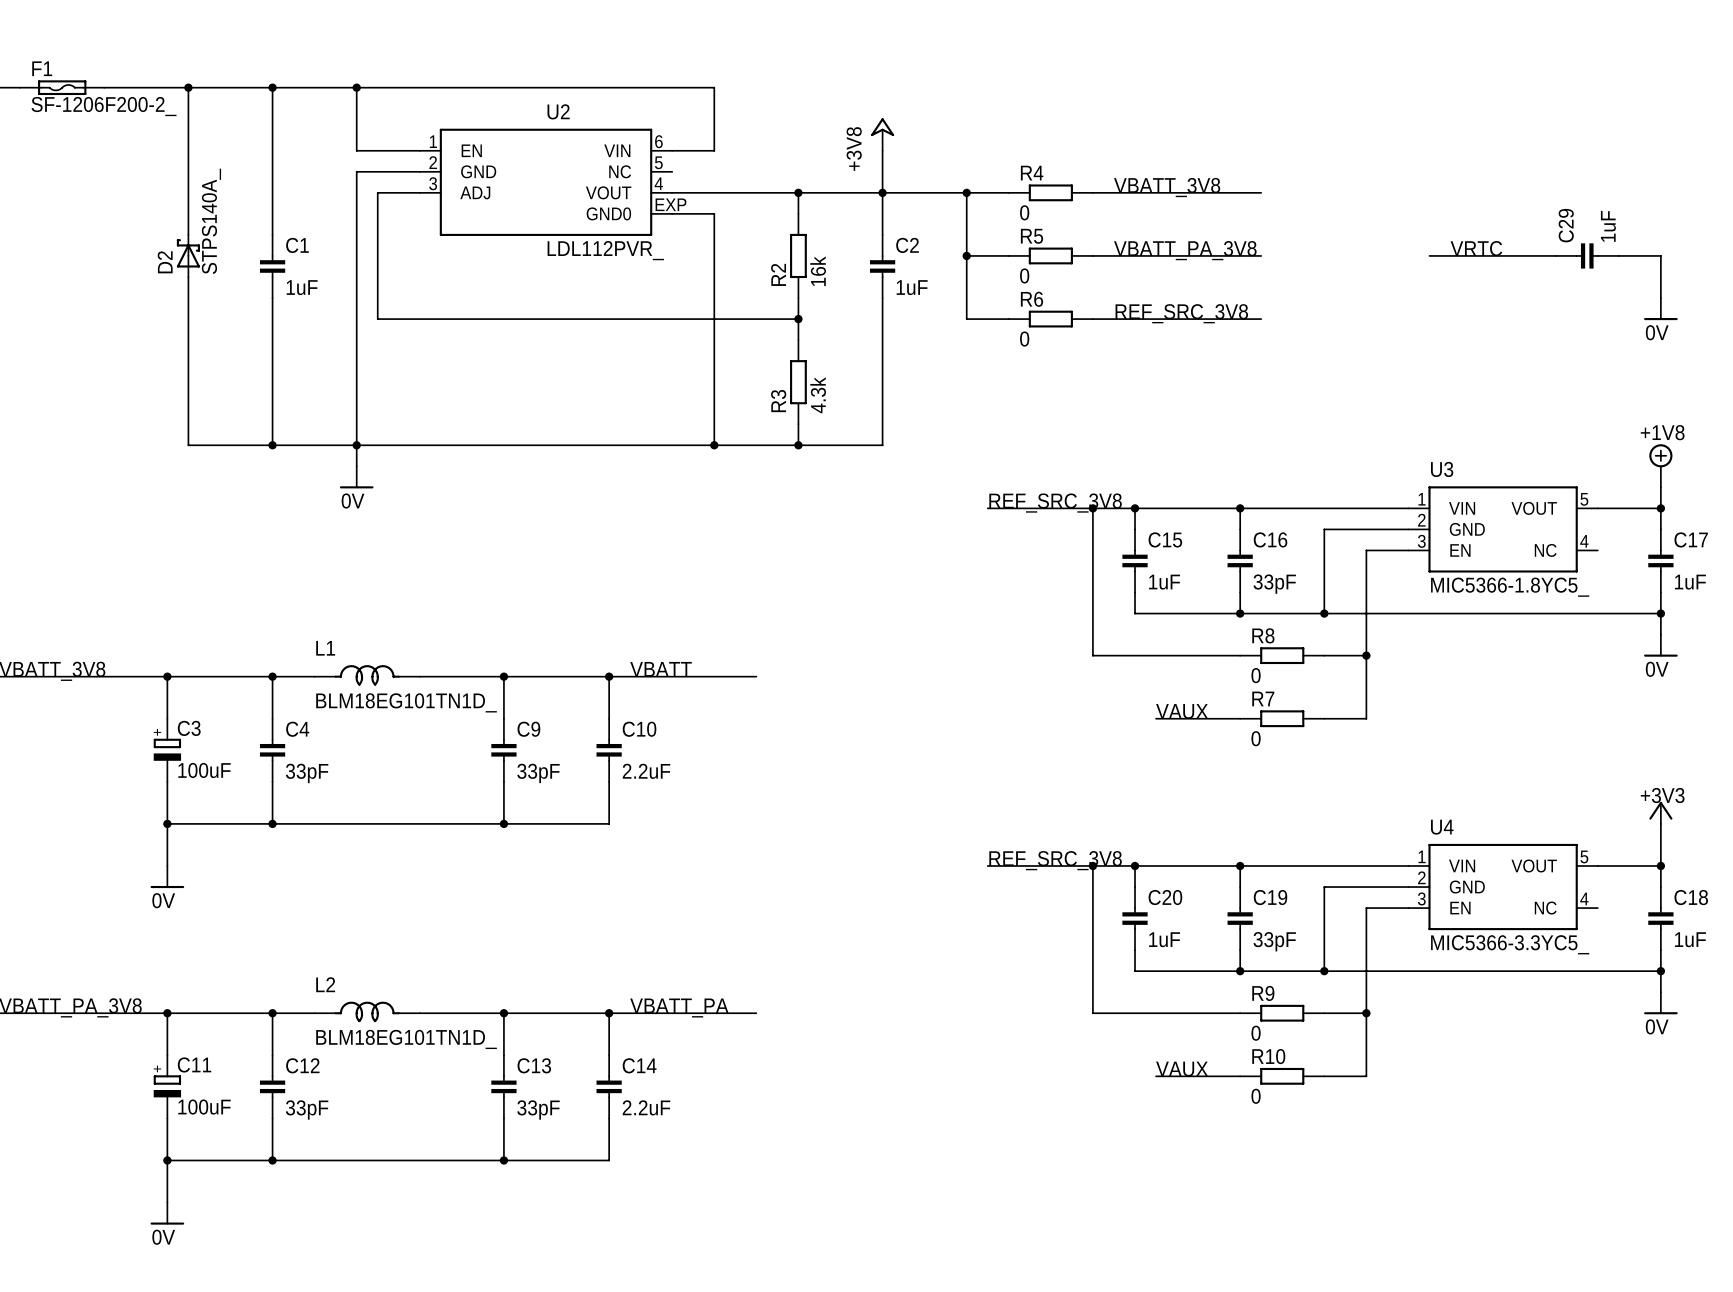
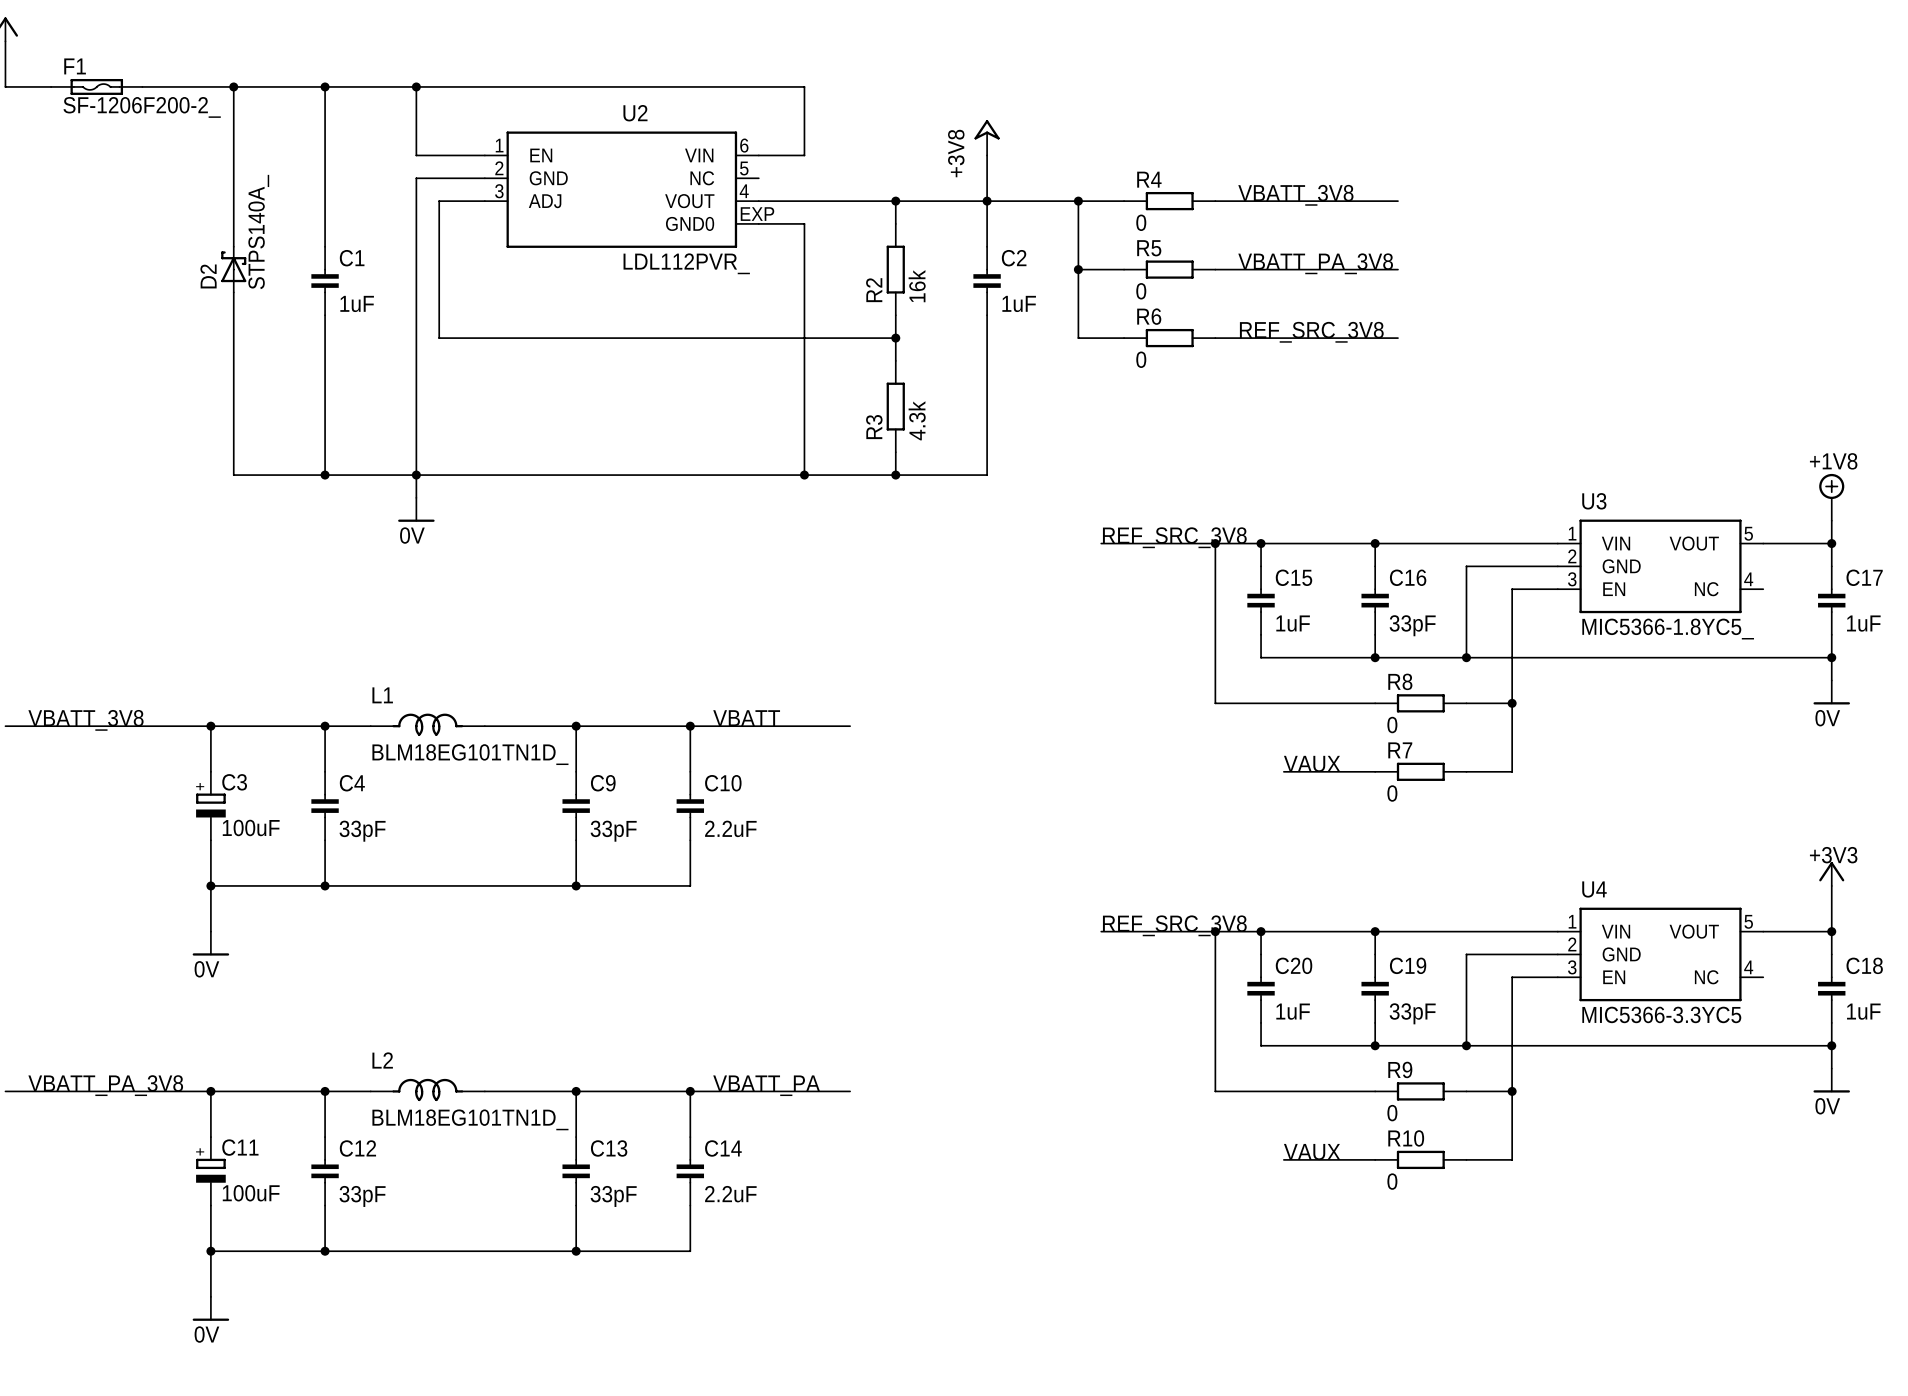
label: VRTC (1476, 248) -> none
wire: (1429, 255) (1555, 255) -> none
C29: 1uF (1587, 255) -> none
wire: (1618, 255) (1660, 255) (1660, 298) -> none
power symbol: 0V (1660, 309) -> none
U4 value: MIC5366-3.3YC5_ (1510, 944) -> MIC5366-3.3YC5 (1661, 1014)

